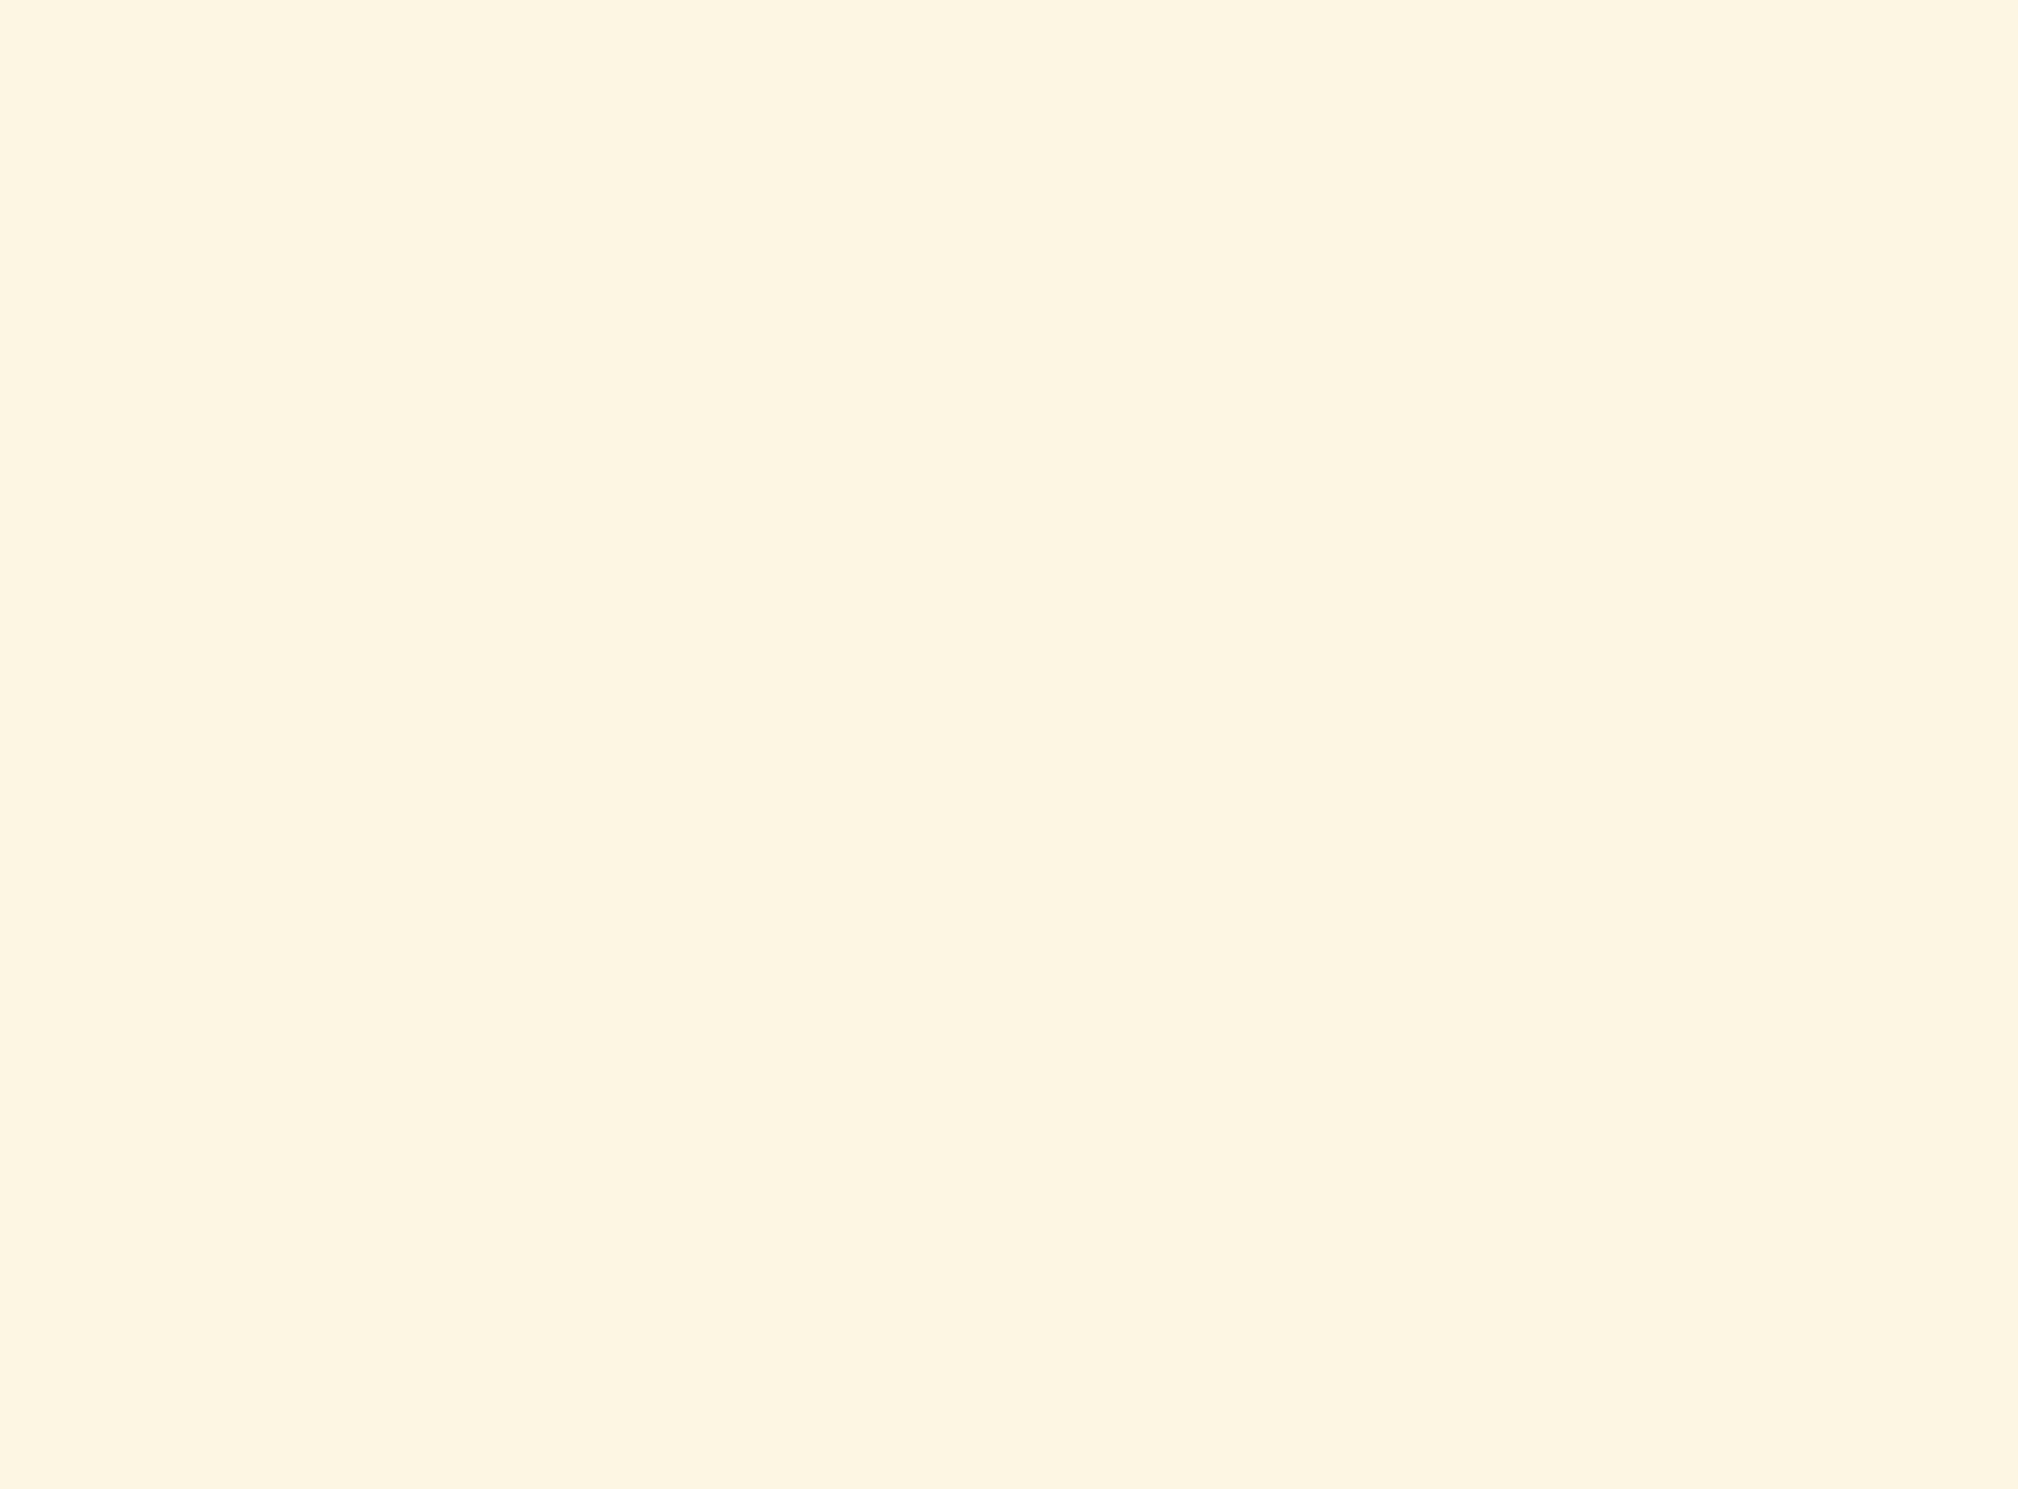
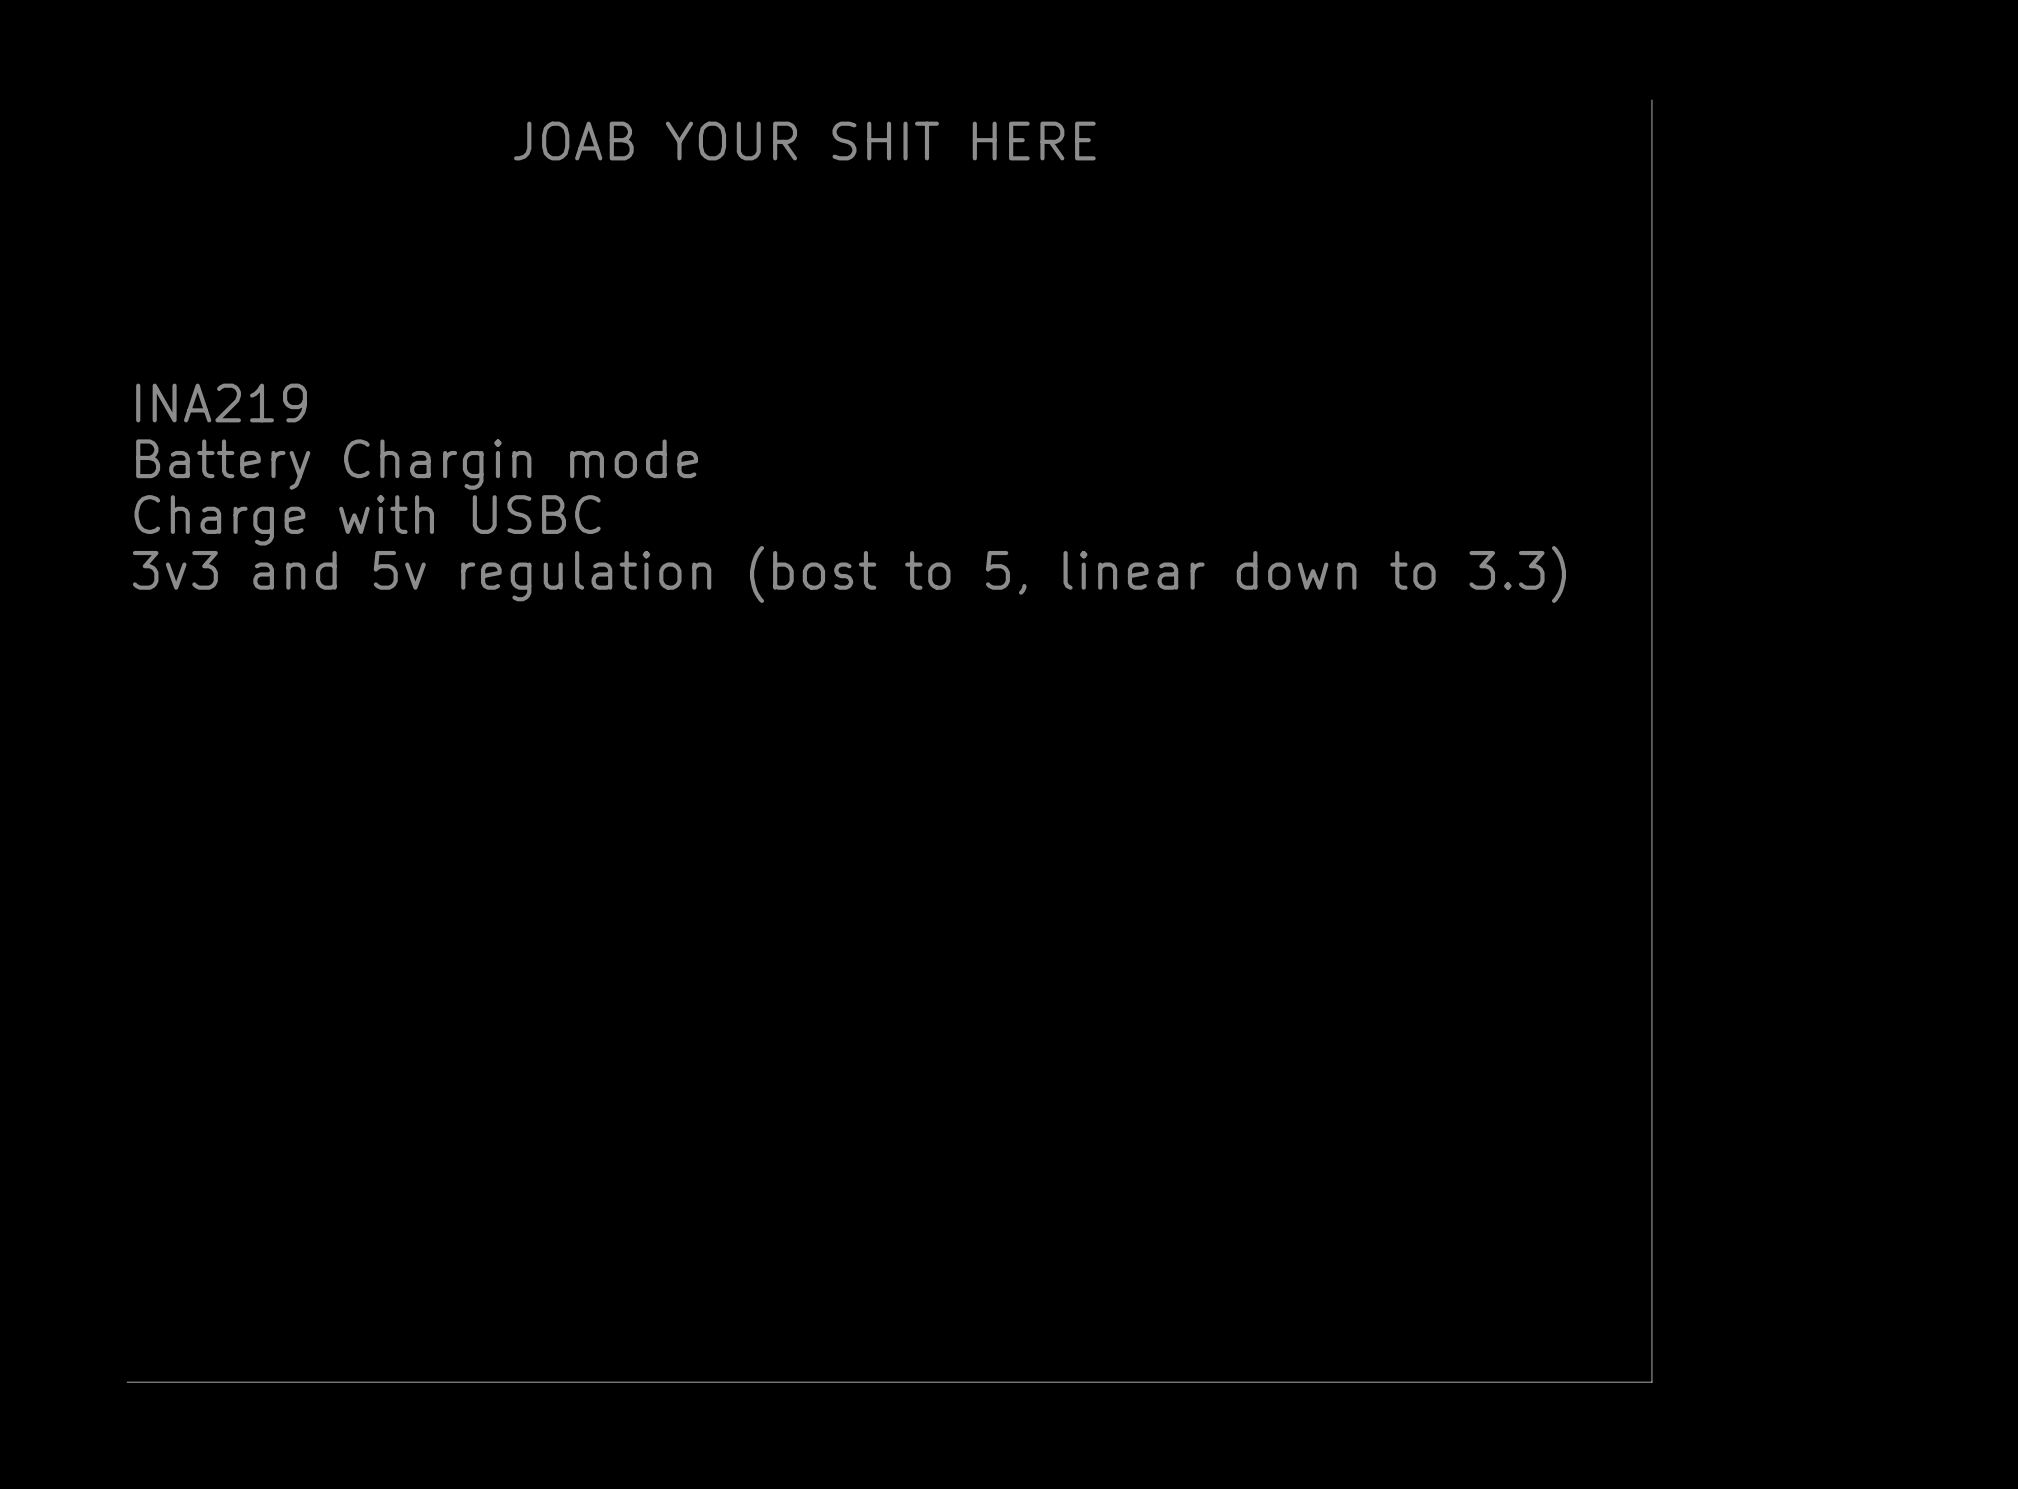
line: none -> (1651, 100) (1651, 1382) (127, 1382)
text: none -> JOAB YOUR SHIT HERE (804, 141)
text: none -> INA219 (221, 402)
text: none -> Battery Chargin mode (417, 464)
text: none -> Charge with USBC (367, 520)
text: none -> 3v3 and 5v regulation (bost to 5, linear down to 3.3) (849, 574)

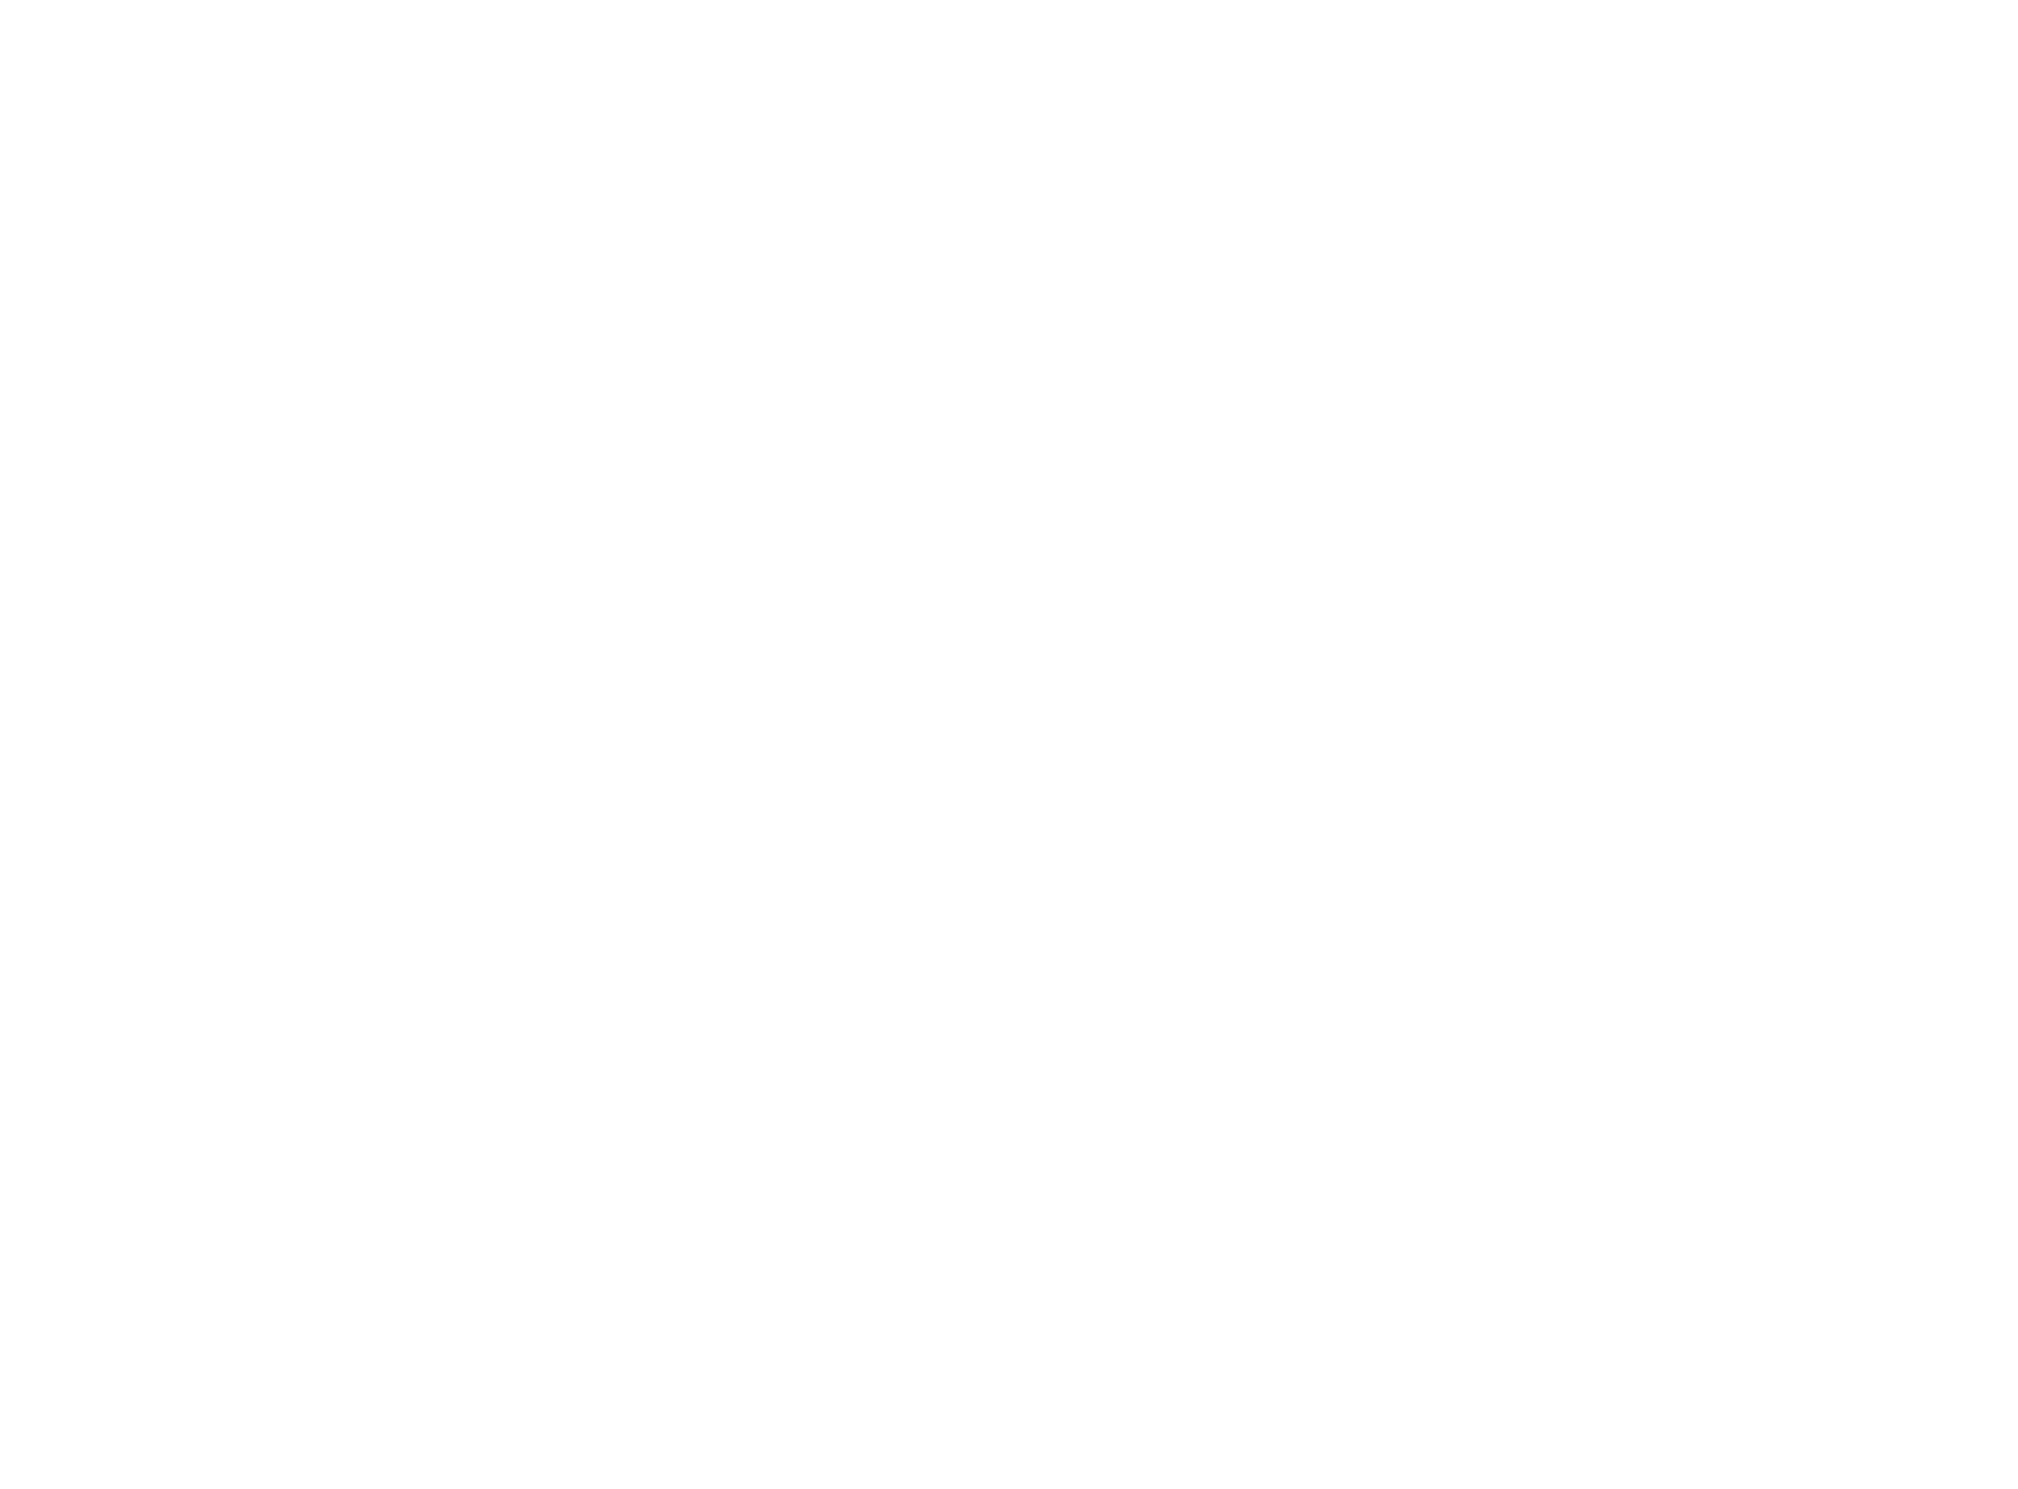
line: (1651, 100) (1651, 1382) (127, 1382) -> none
text: JOAB YOUR SHIT HERE (804, 141) -> none
text: INA219 (221, 402) -> none
text: Battery Chargin mode (417, 464) -> none
text: Charge with USBC (367, 520) -> none
text: 3v3 and 5v regulation (bost to 5, linear down to 3.3) (849, 574) -> none

